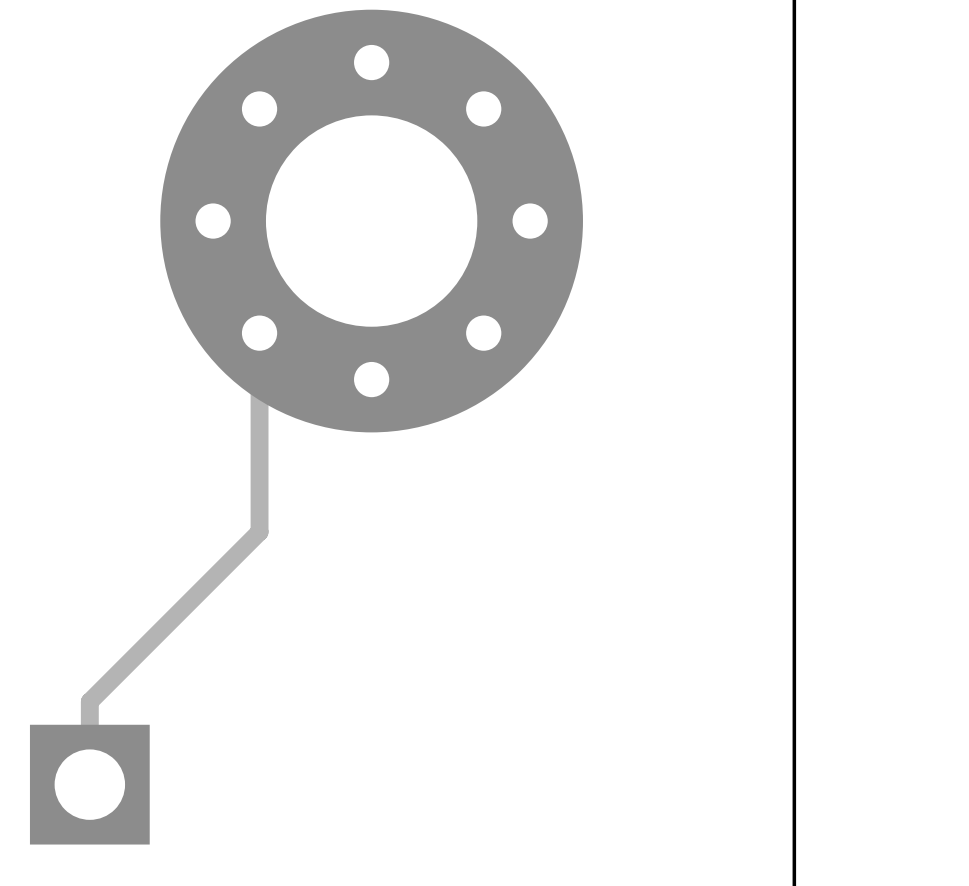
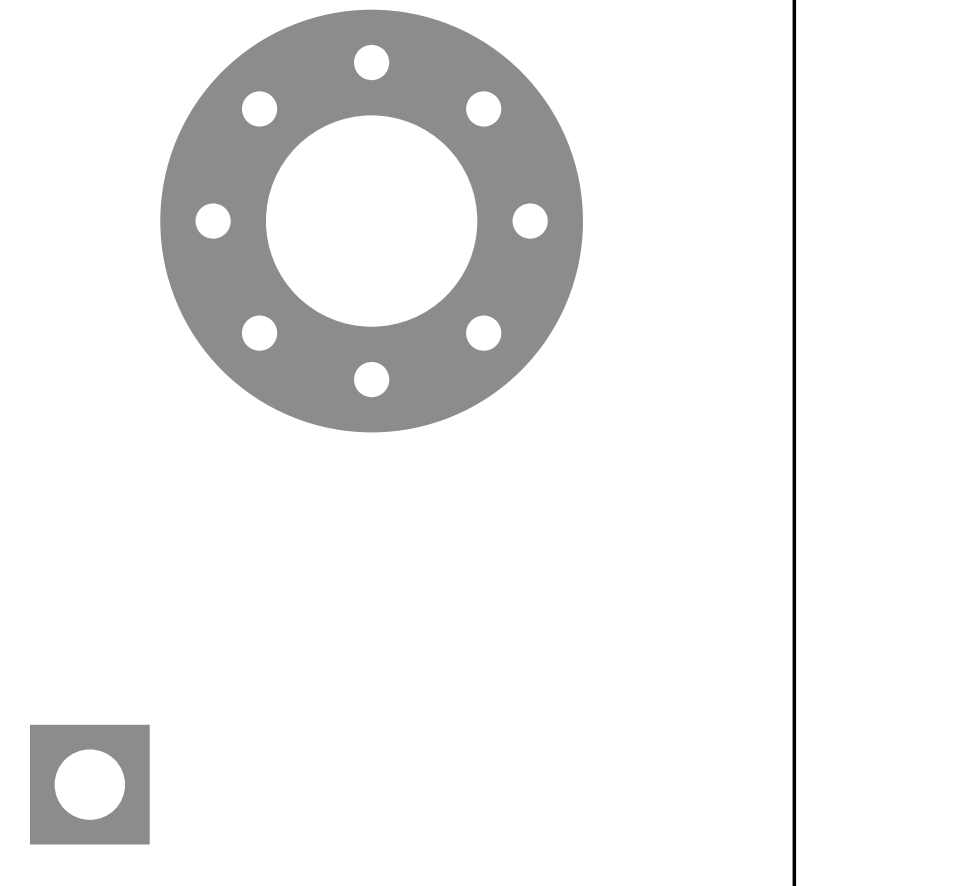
track: (259, 108) (259, 174) (213, 221) (259, 267) (259, 531) (89, 701) (89, 784) -> none

